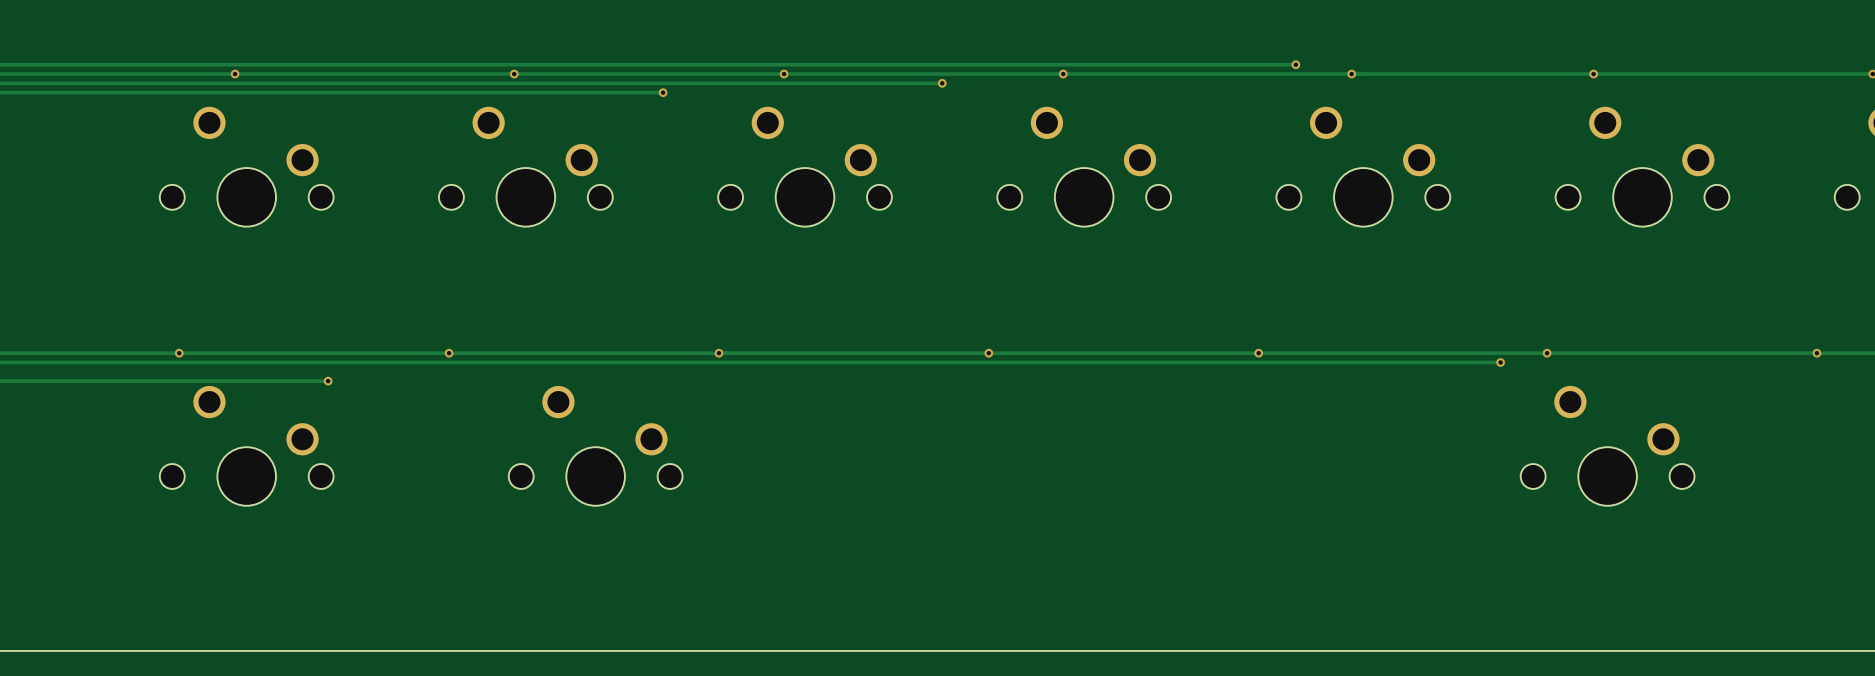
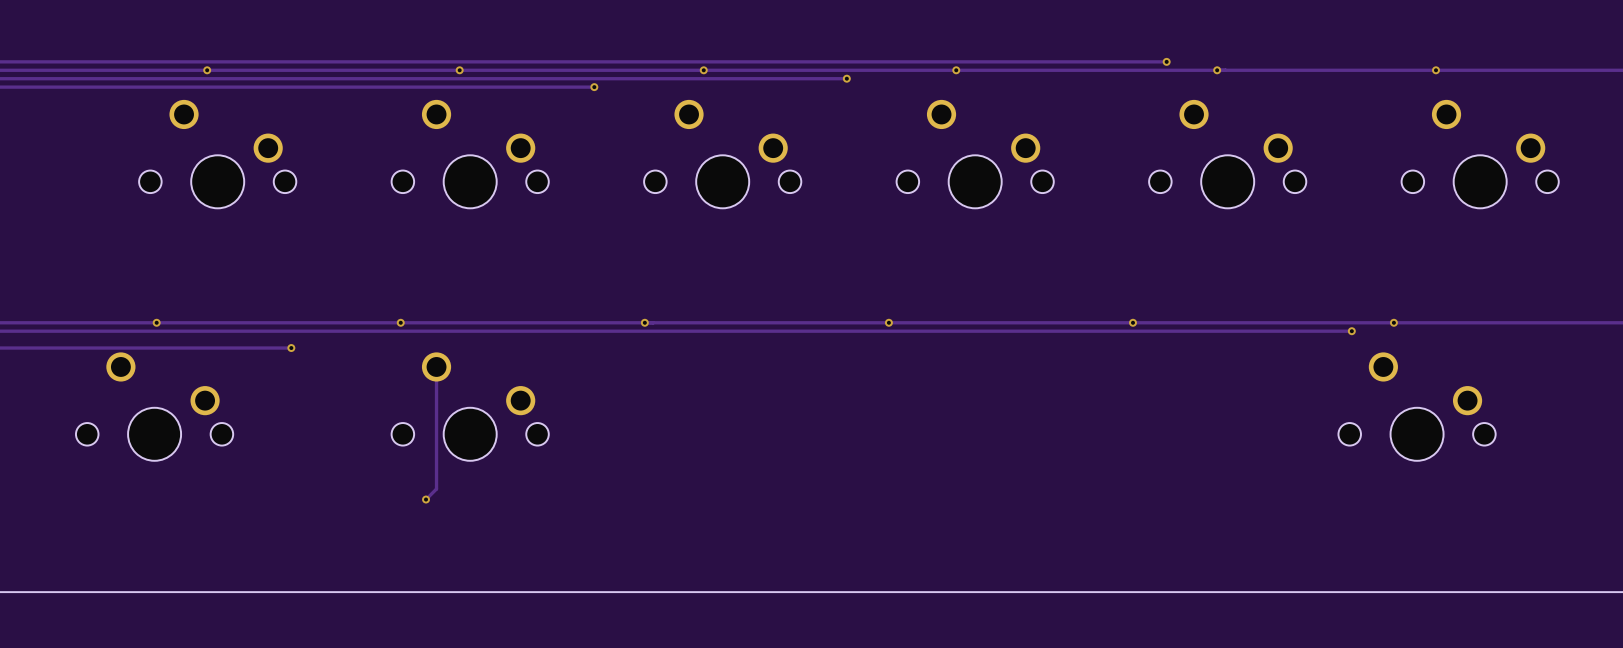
track: none -> (436, 366) (436, 489) (426, 499)
part position: (246, 445) -> (154, 406)
part position: (595, 445) -> (470, 406)
part position: (1607, 445) -> (1417, 406)
via: none -> (426, 499)

